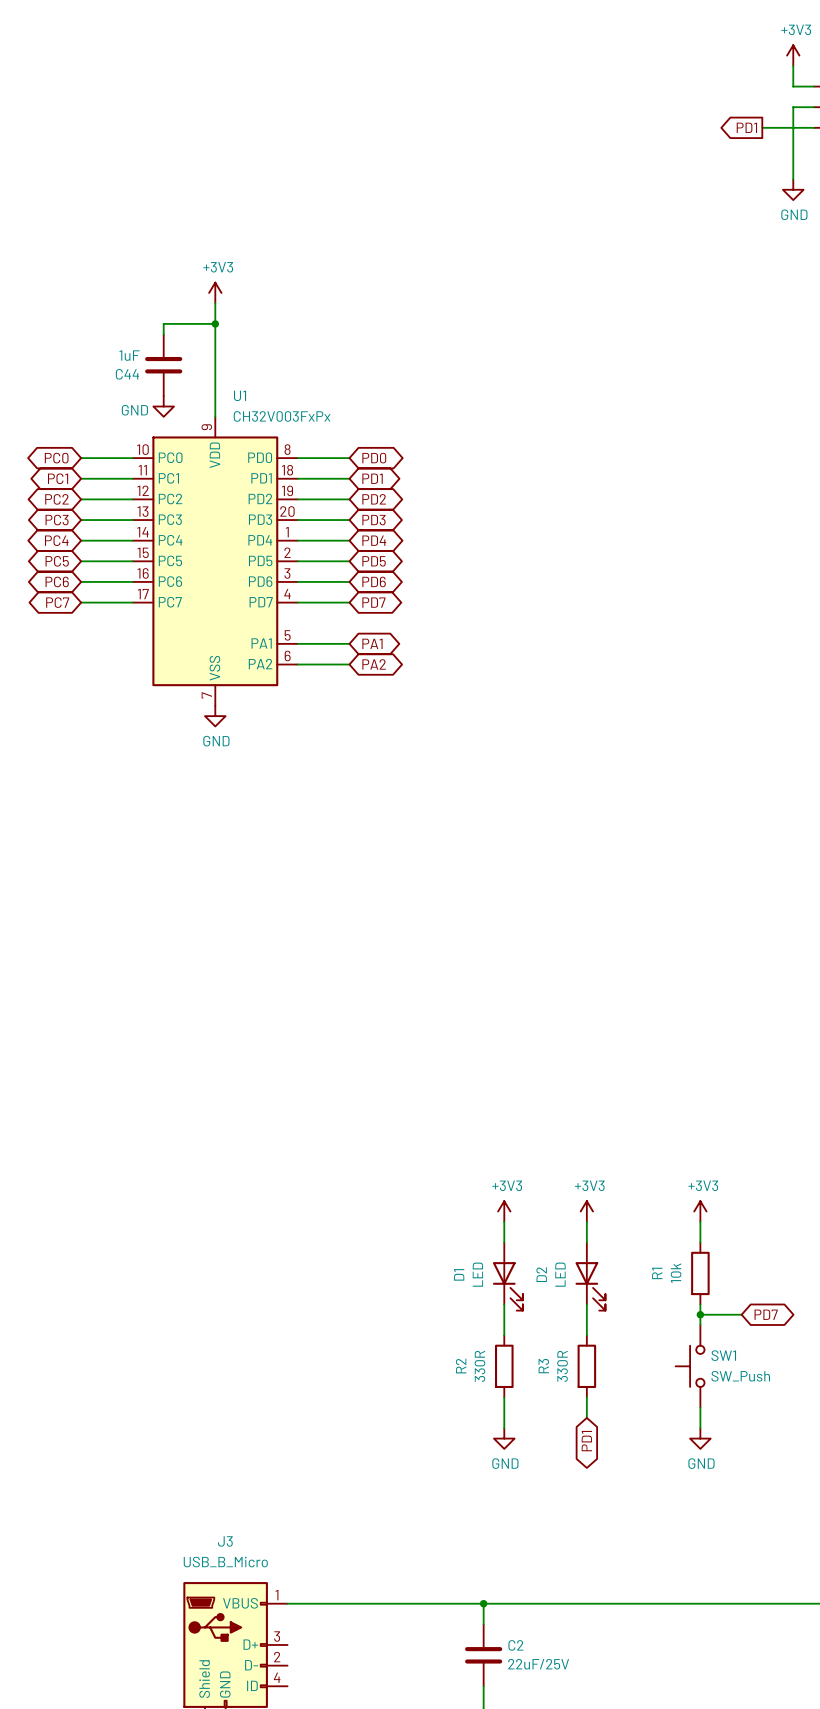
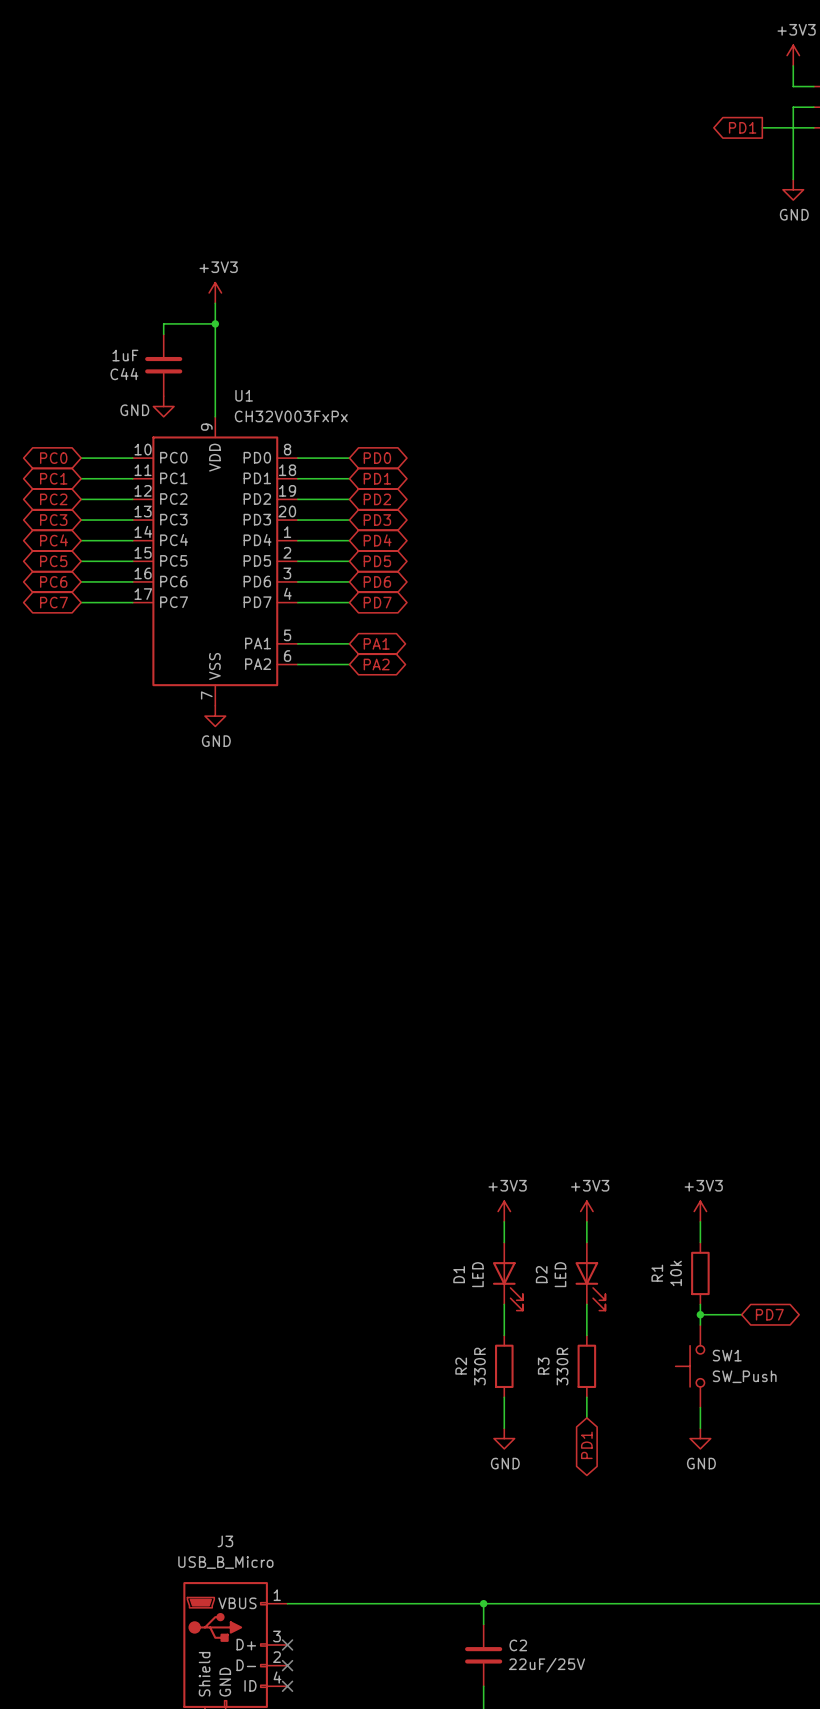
no-connect mark: none -> (287, 1644)
no-connect mark: none -> (287, 1665)
no-connect mark: none -> (287, 1686)

